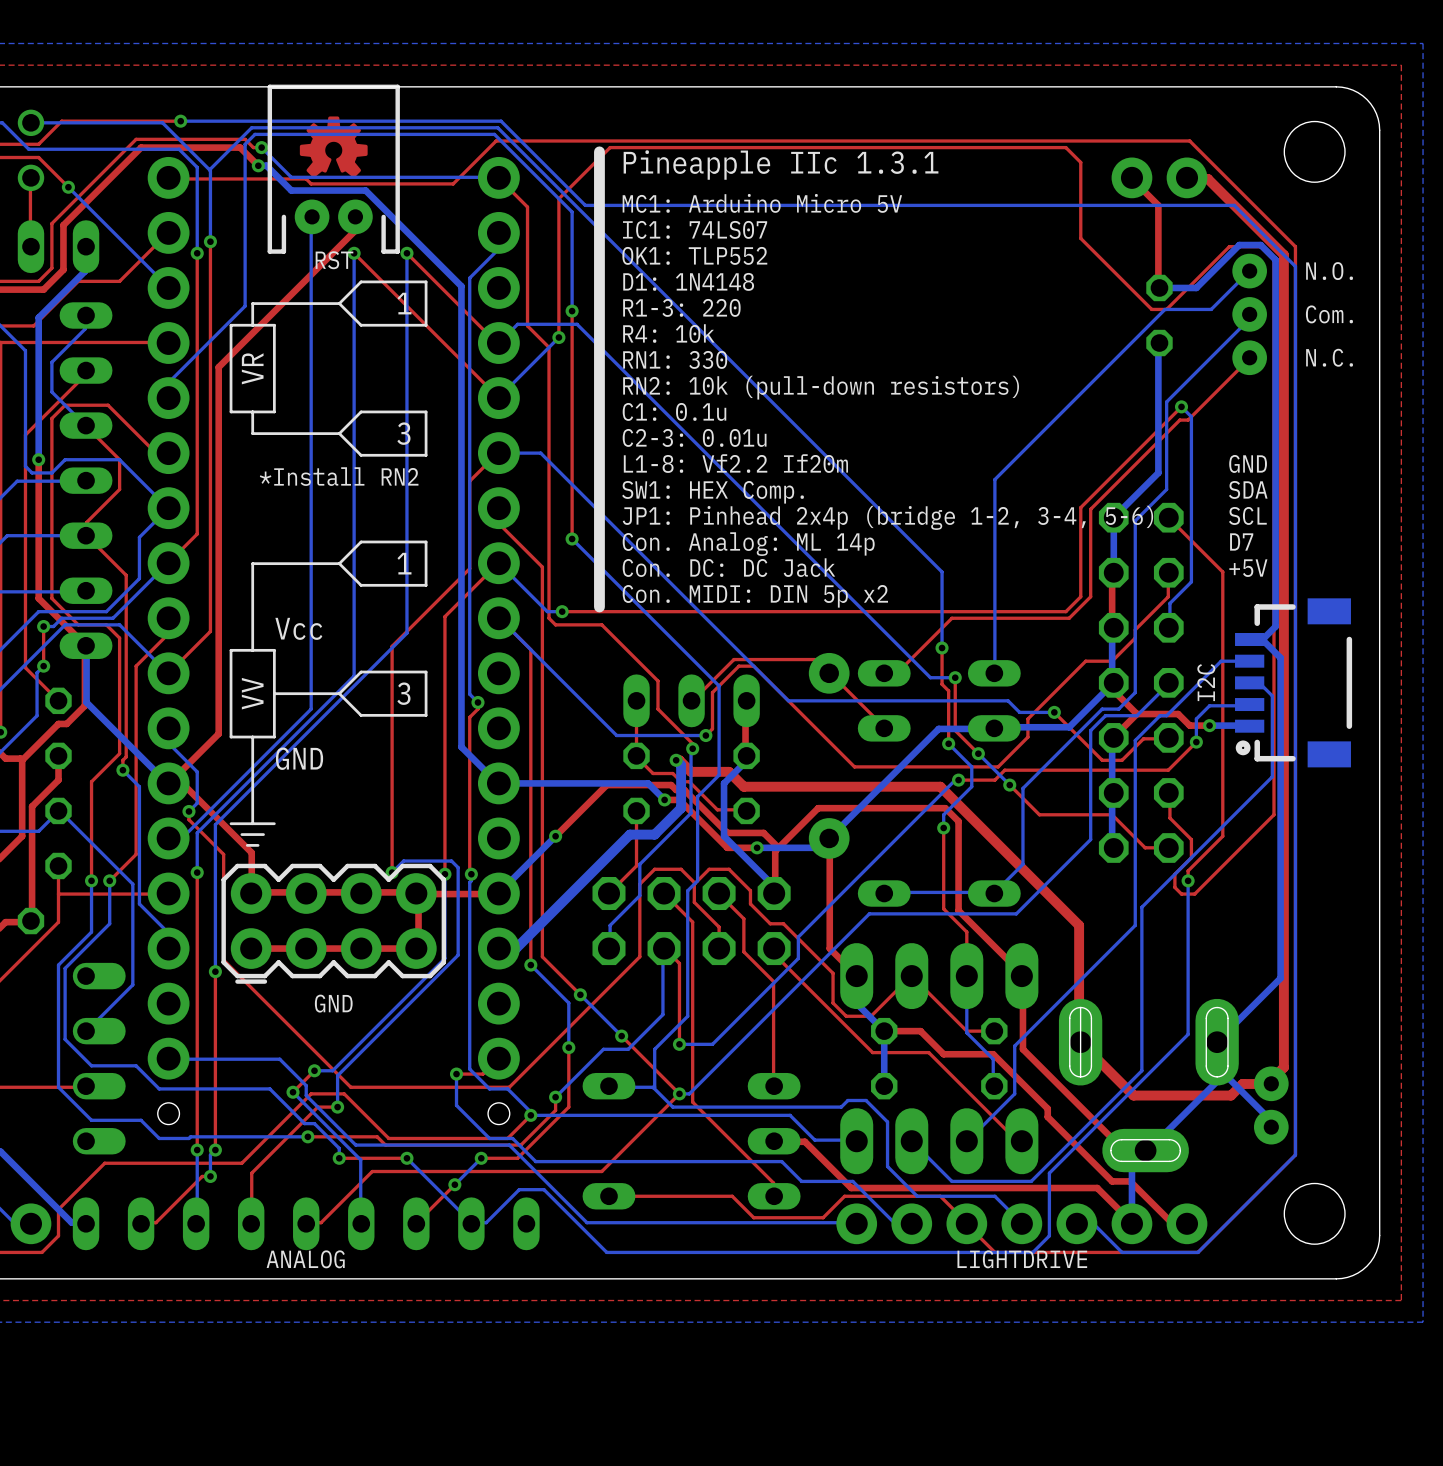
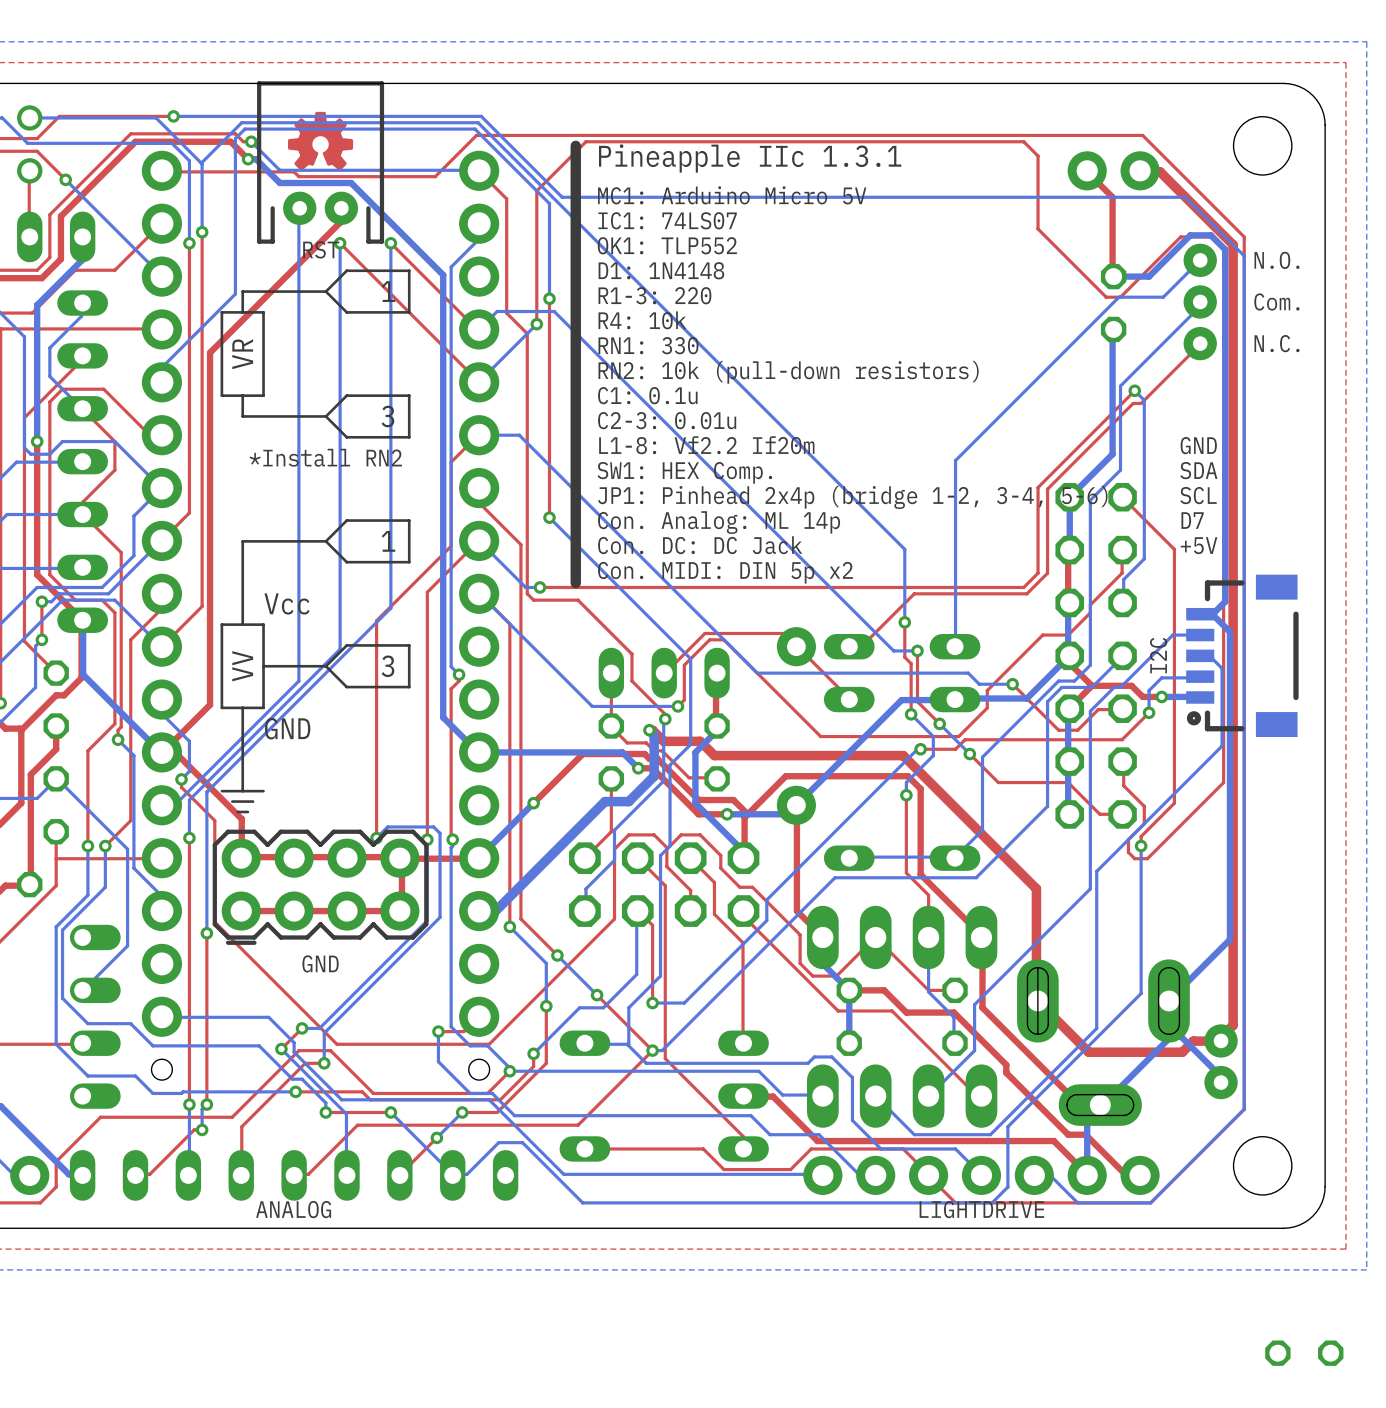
part: none -> (1304, 1353)

